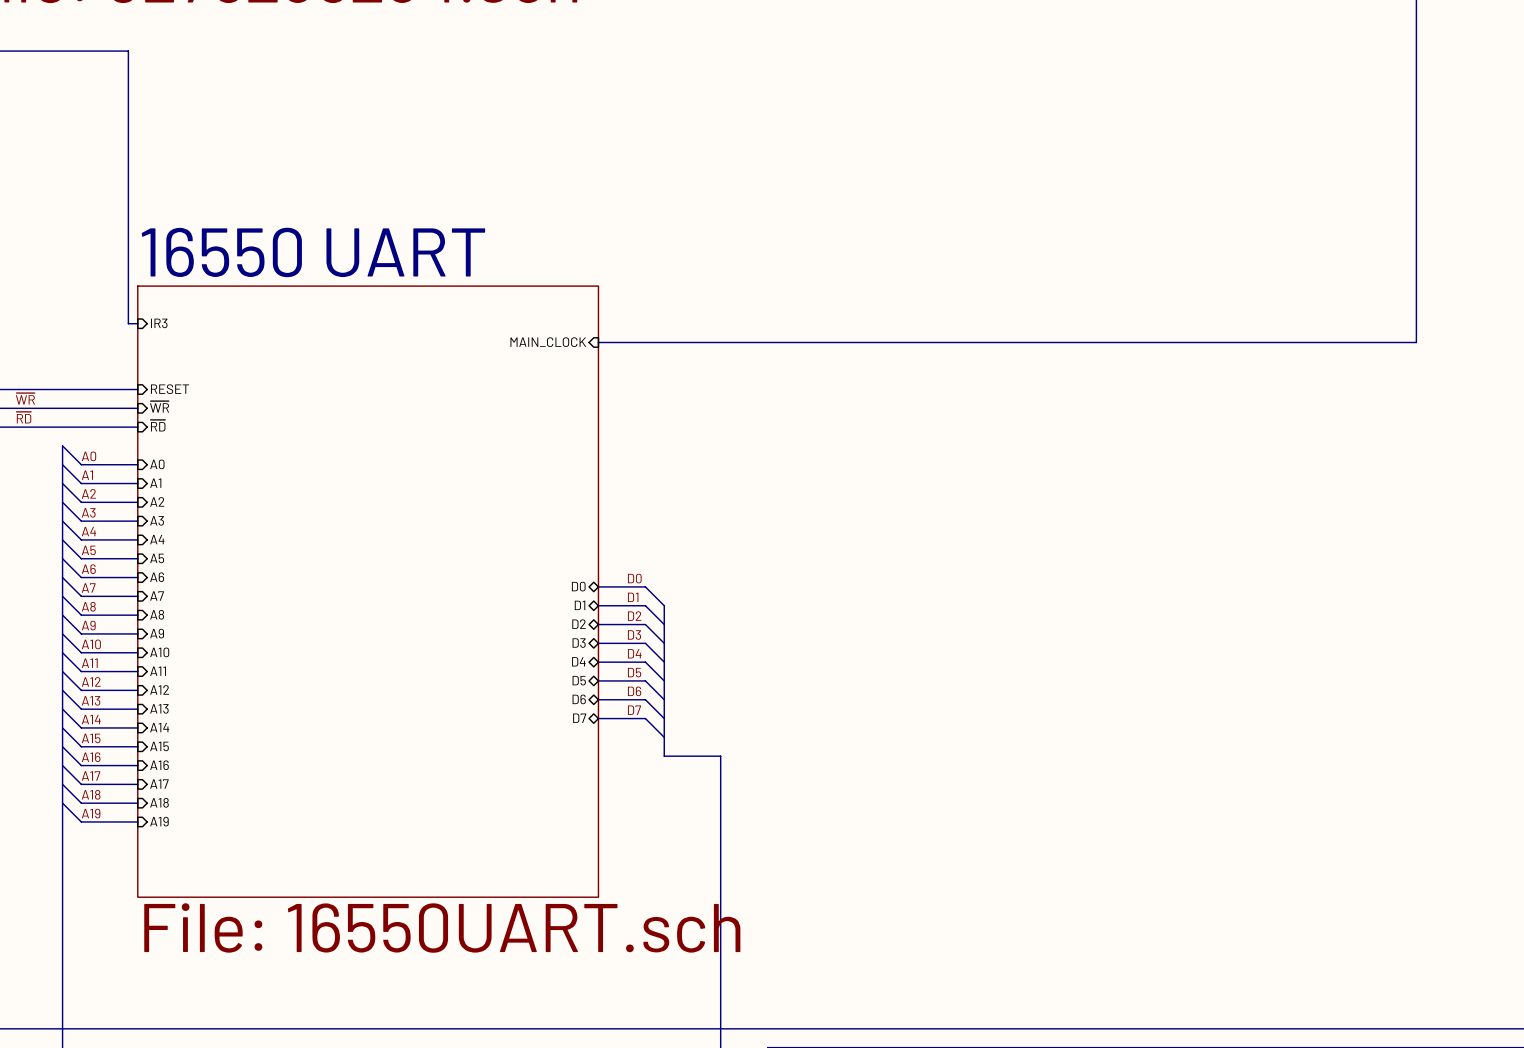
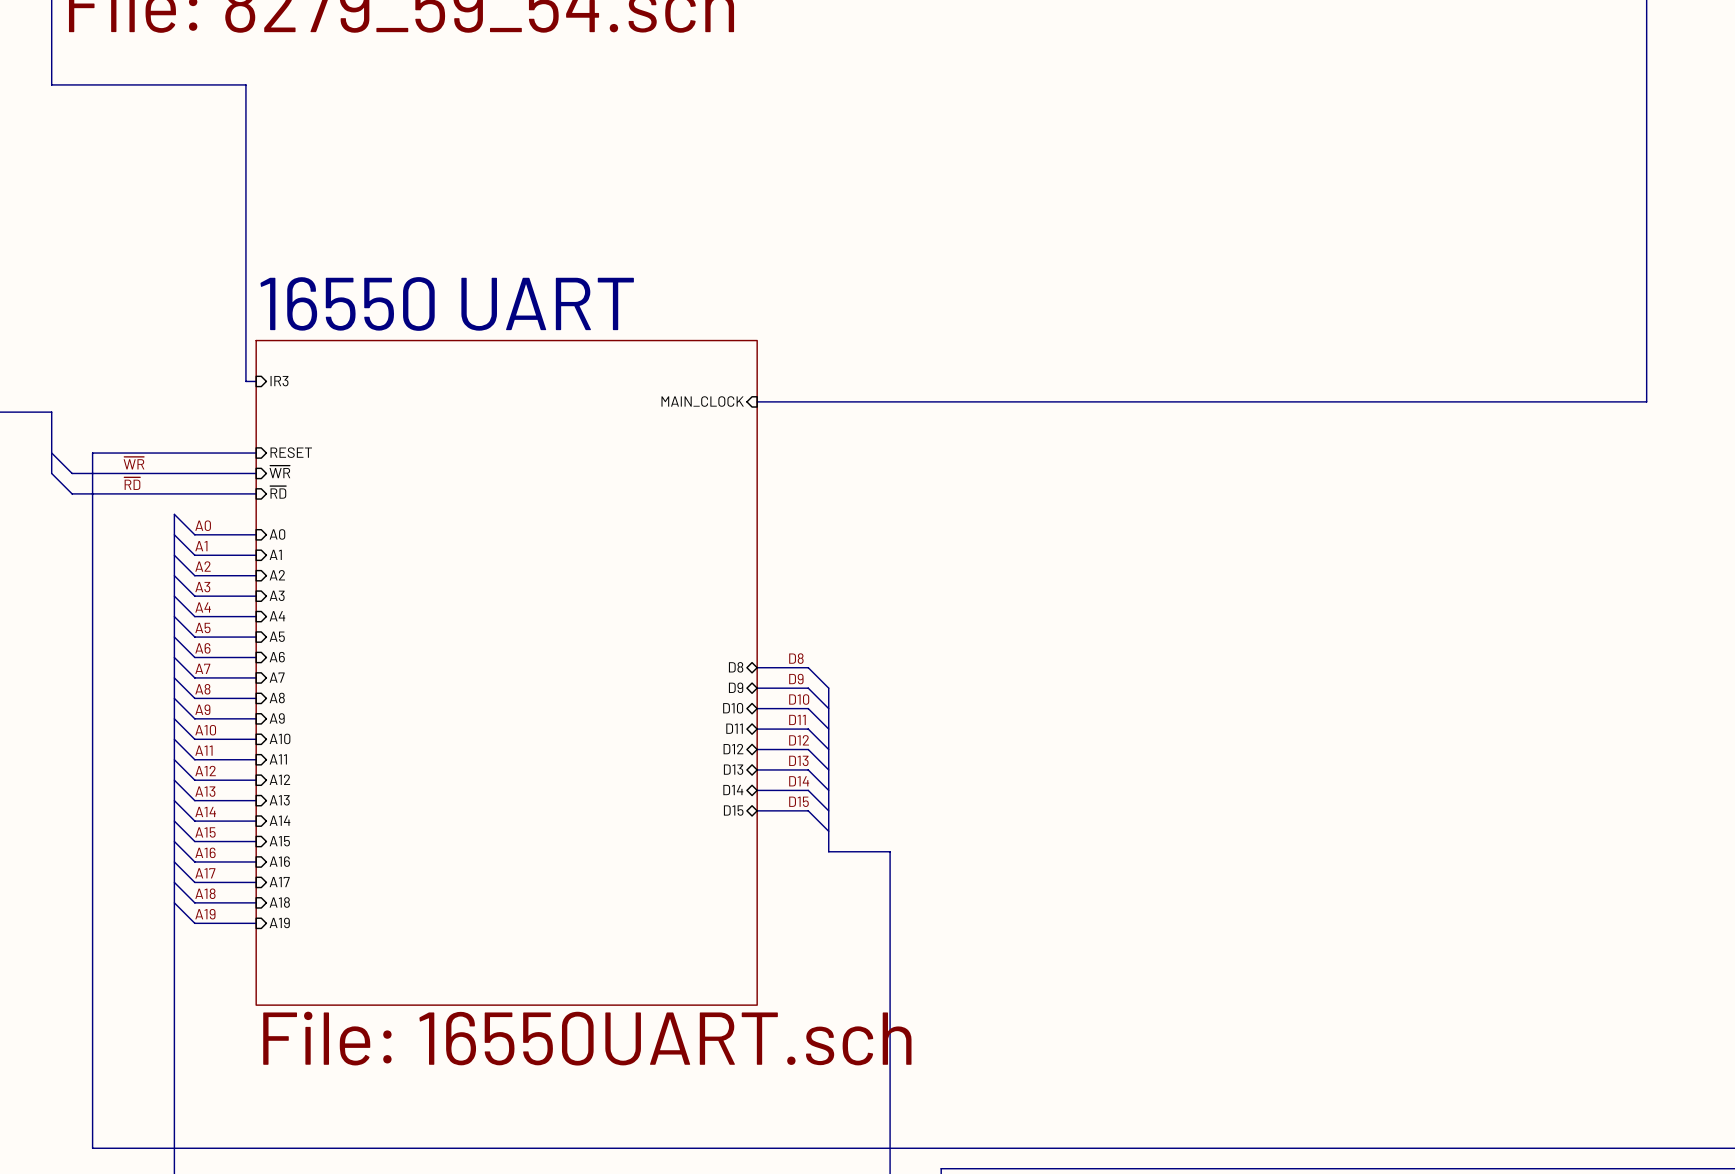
label: D0 (634, 578) -> D8 (796, 658)
sheet pin: D0 (578, 586) -> D8 (736, 667)
label: D1 (633, 597) -> D9 (796, 679)
sheet pin: D1 (580, 605) -> D9 (736, 687)
label: D2 (634, 616) -> D10 (799, 699)
sheet pin: D2 (579, 624) -> D10 (733, 708)
label: D3 (634, 635) -> D11 (797, 719)
sheet pin: D3 (579, 643) -> D11 (734, 728)
label: D4 (634, 653) -> D12 (799, 740)
sheet pin: D4 (578, 661) -> D12 (733, 749)
label: D5 (634, 672) -> D13 (798, 760)
sheet pin: D5 (579, 680) -> D13 (733, 769)
label: D6 (634, 691) -> D14 (799, 781)
sheet pin: D6 (579, 699) -> D14 (733, 790)
label: D7 (634, 710) -> D15 (798, 801)
sheet pin: D7 (579, 718) -> D15 (733, 810)

